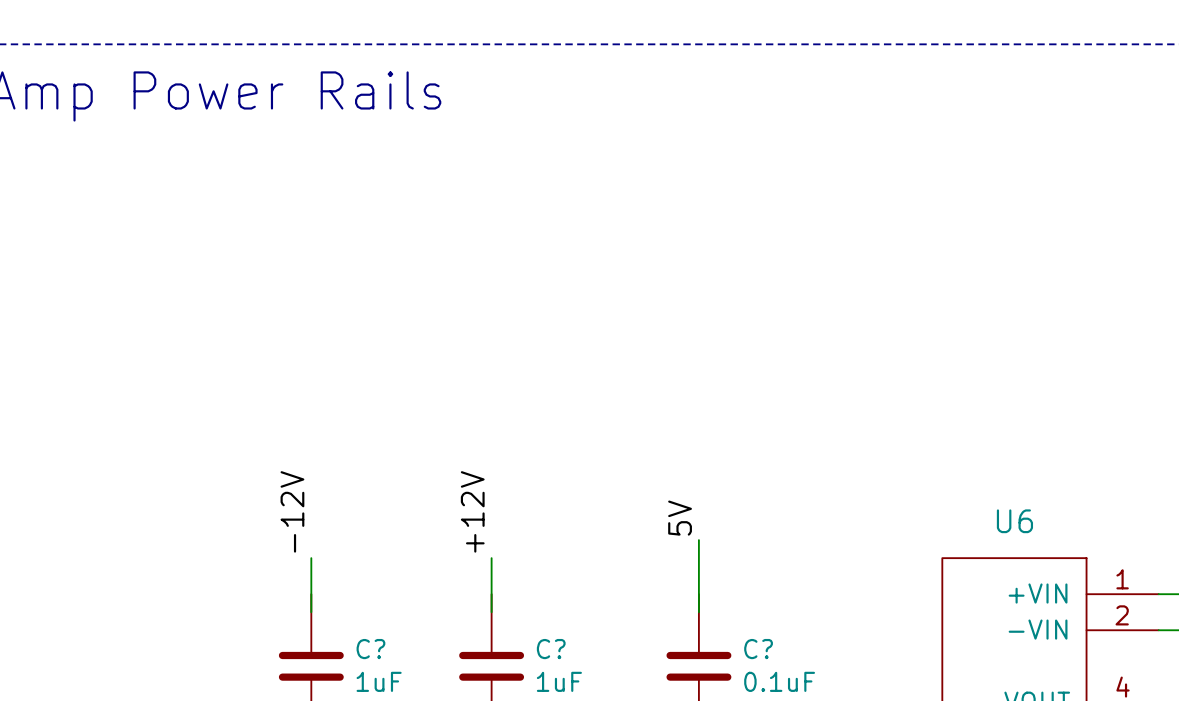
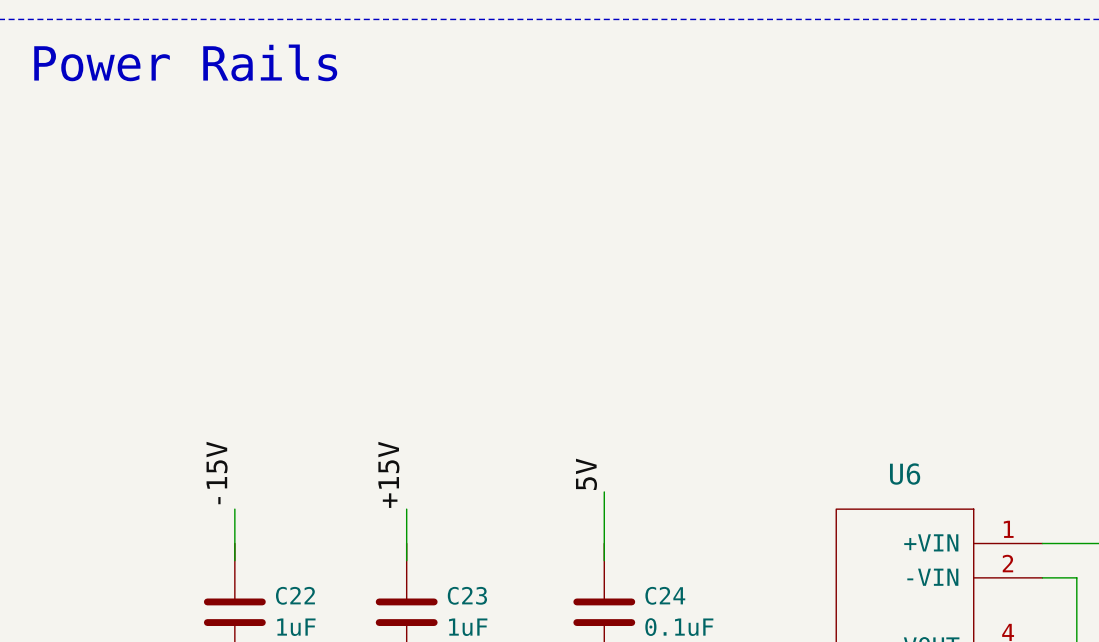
label: -12V (292, 511) -> -15V (217, 473)
label: +12V (472, 511) -> +15V (388, 474)
C? name: C? (370, 649) -> C22 (295, 595)
C? name: C? (551, 649) -> C23 (467, 595)
C? name: C? (758, 649) -> C24 (665, 595)

